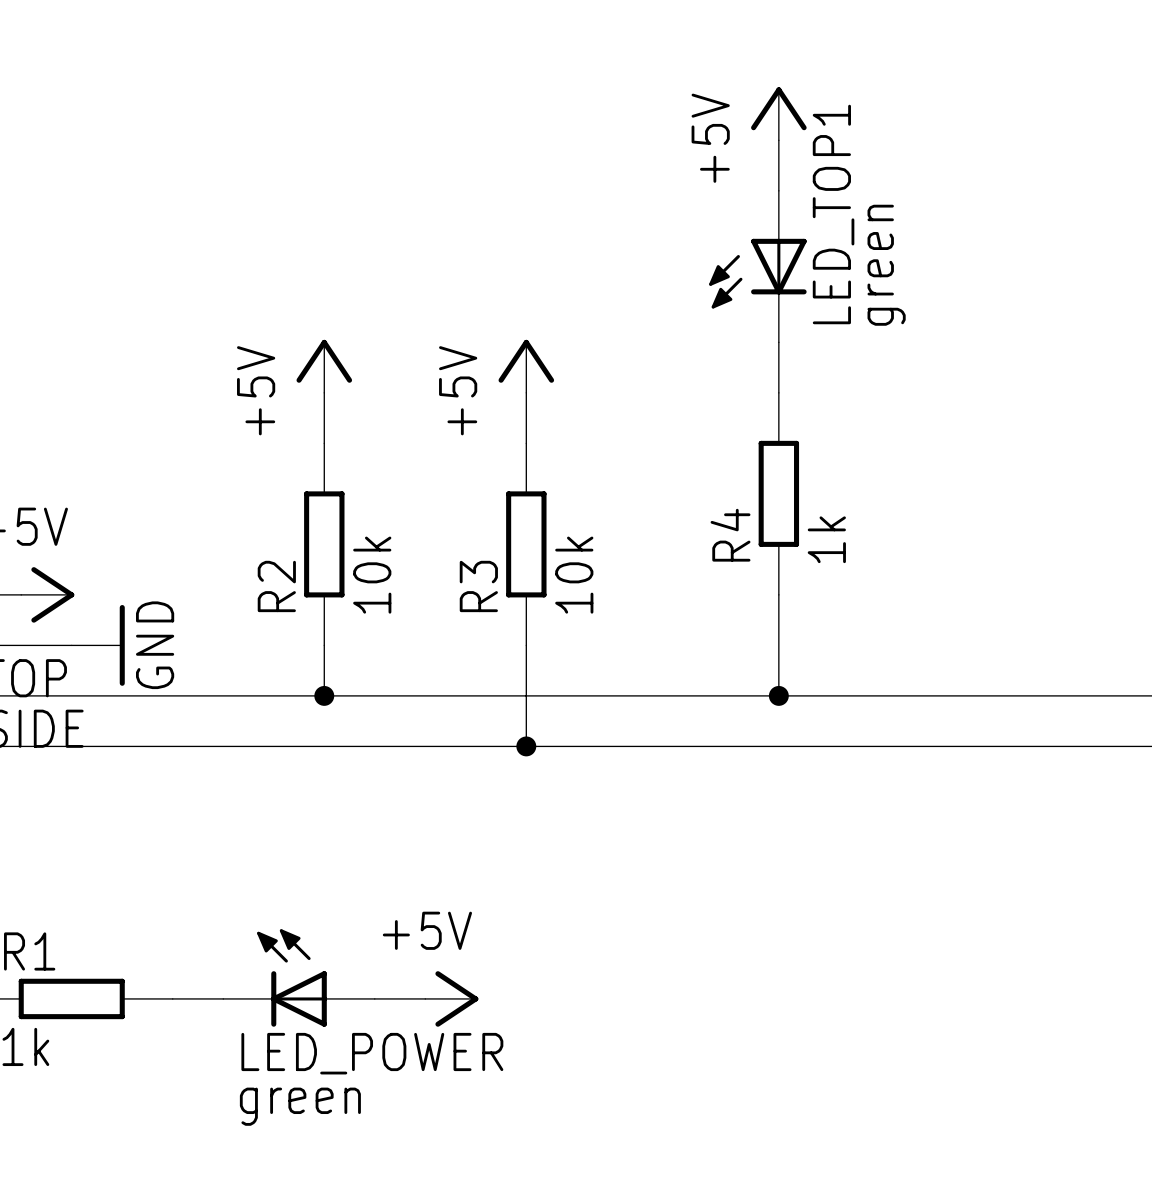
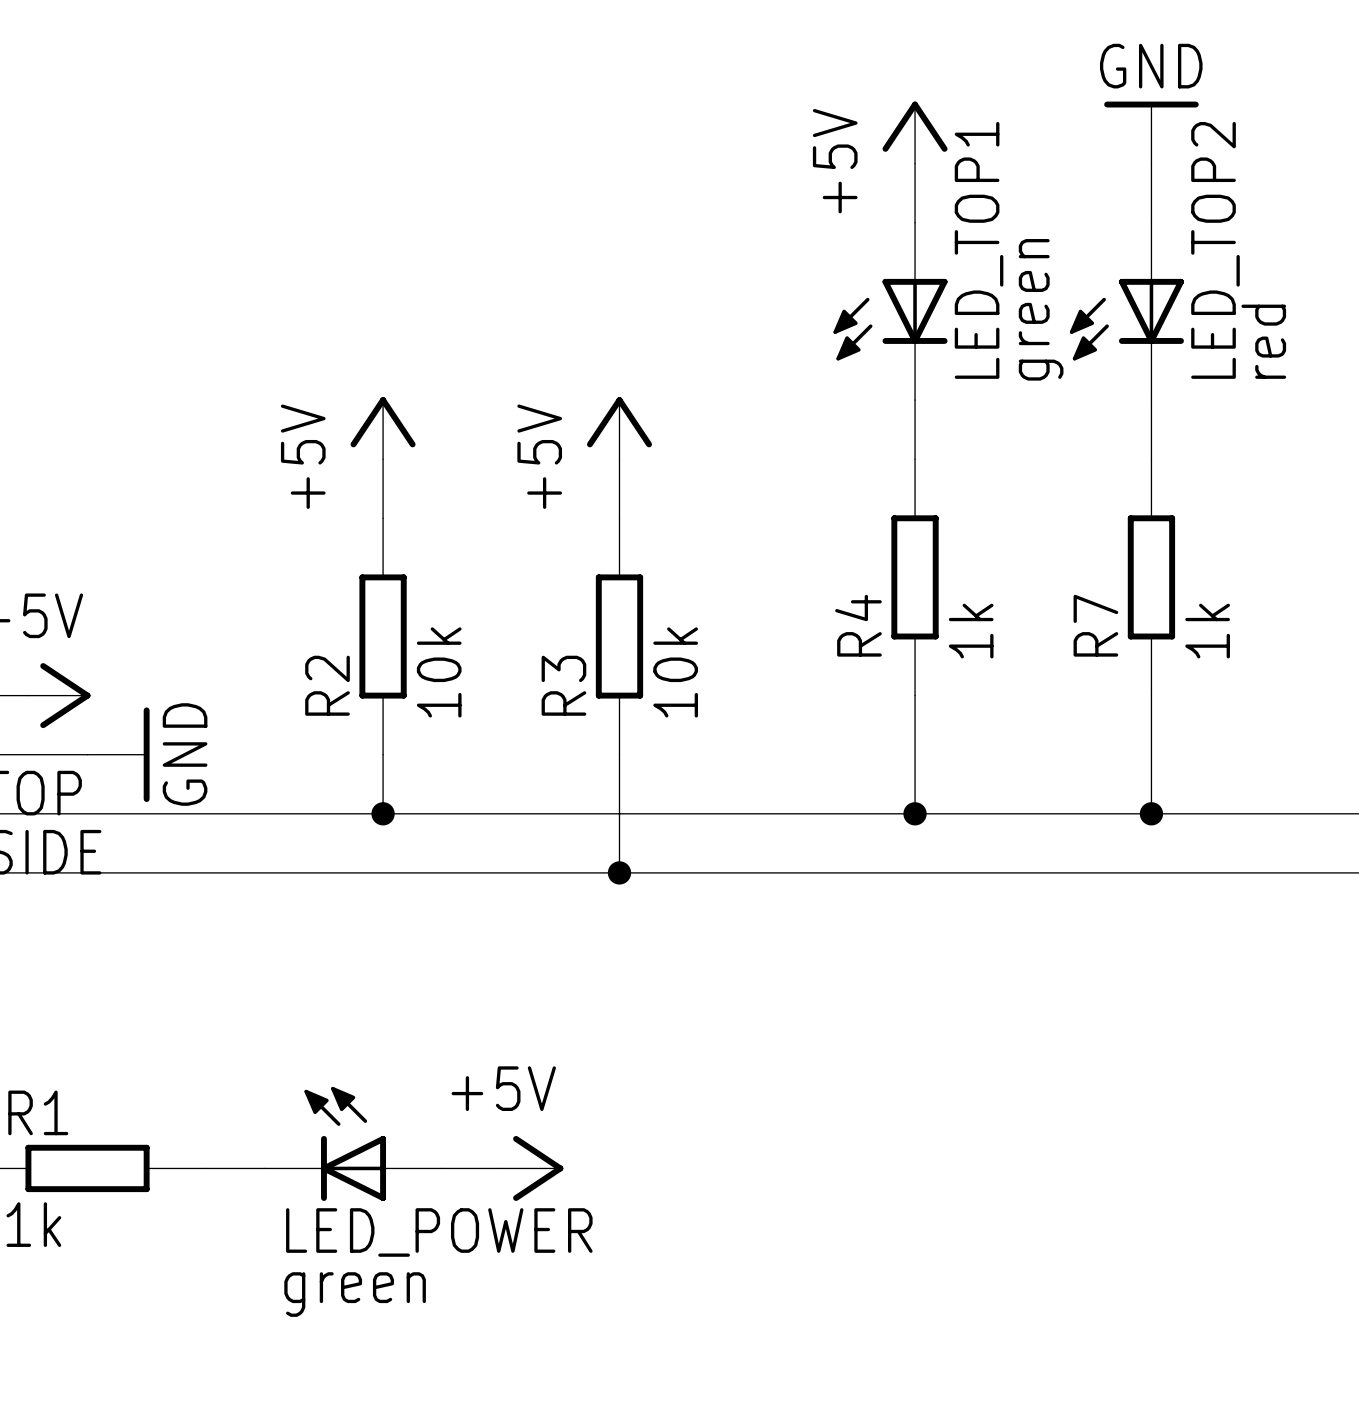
power symbol: none -> GND (1151, 132)
wire: none -> (1151, 163) (1151, 222)
LED_TOP2: none -> red (1126, 311)
wire: none -> (1151, 400) (1151, 459)
R7: none -> 1k (1151, 577)
wire: none -> (1151, 695) (1151, 813)
junction: none -> (1151, 813)

